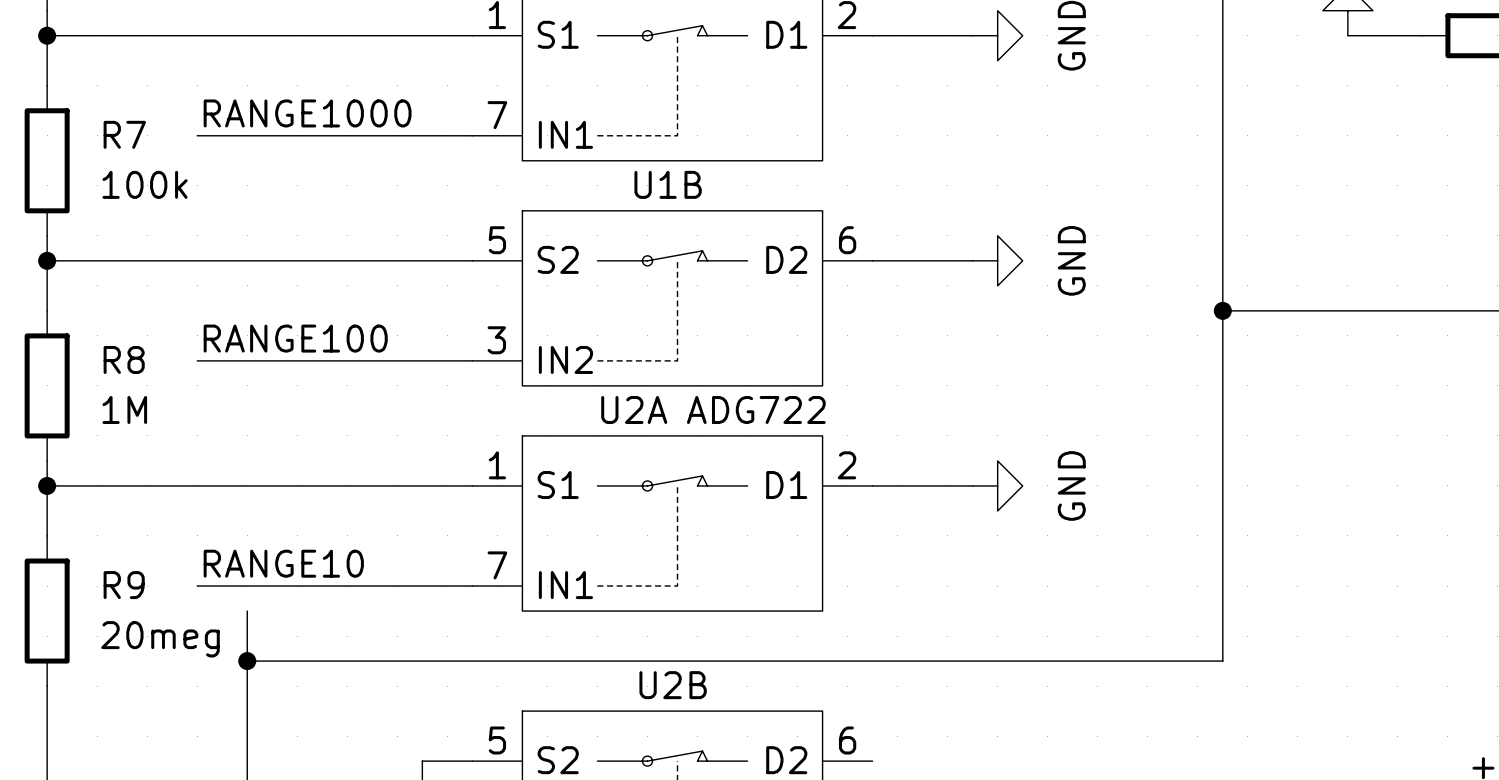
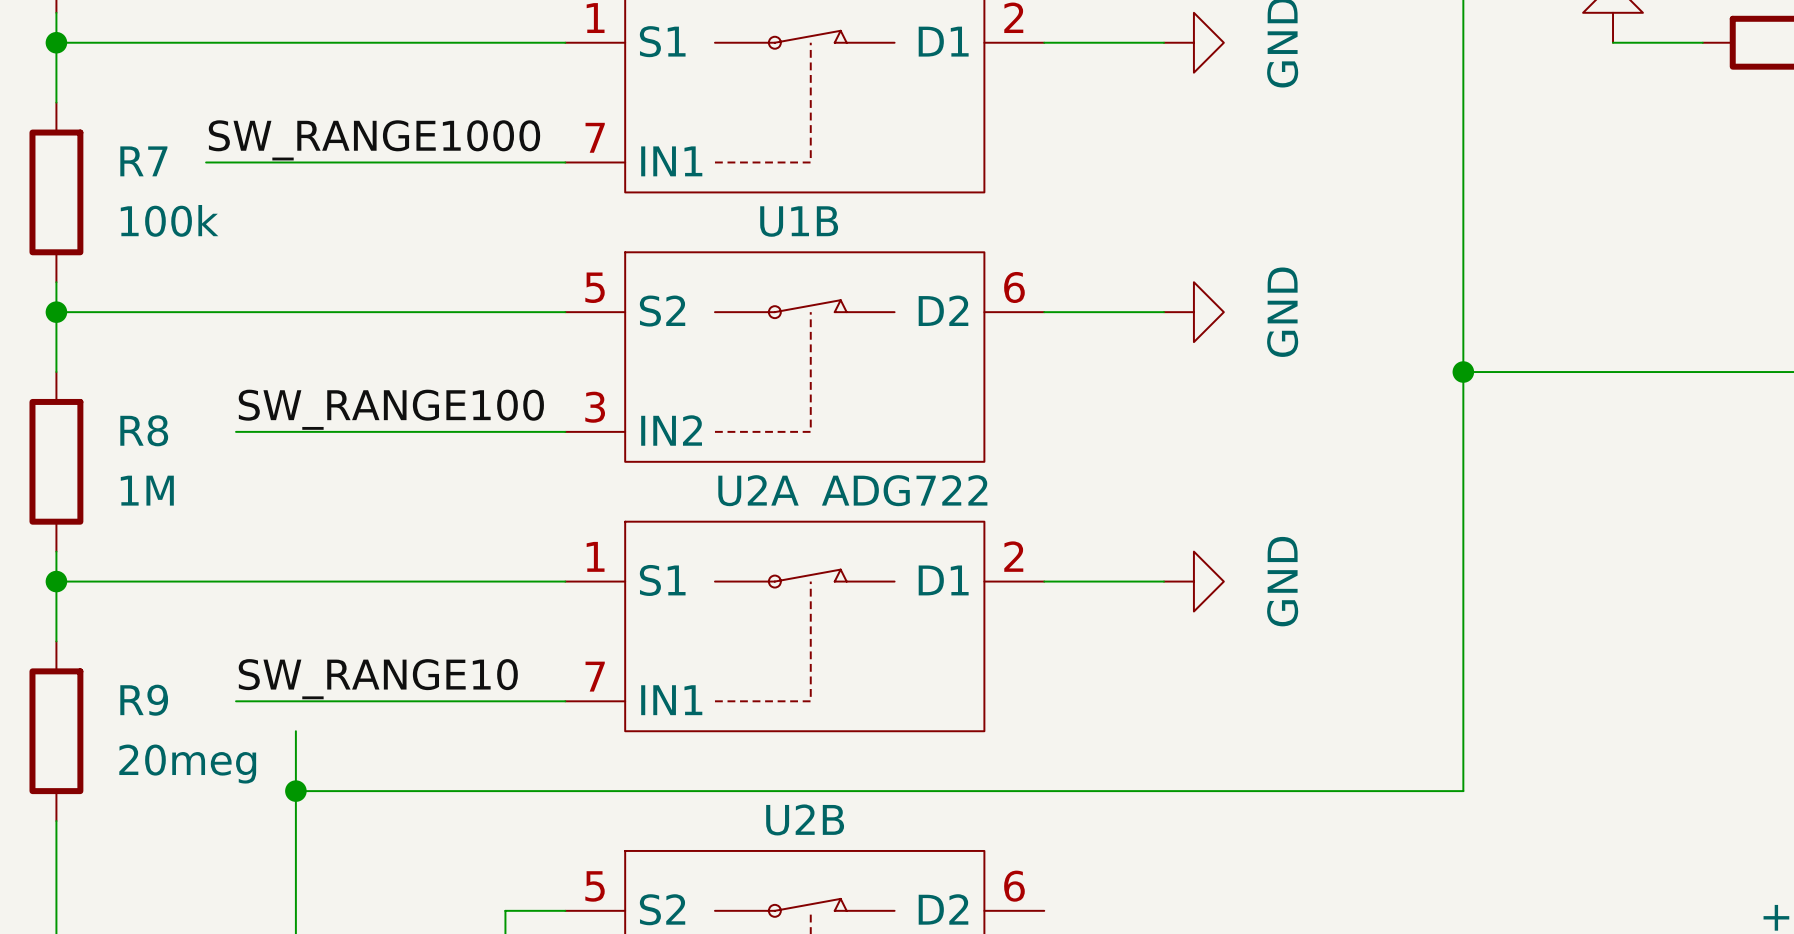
label: RANGE1000 (307, 113) -> SW_RANGE1000 (374, 140)
wire: none -> (206, 162) (236, 162)
label: RANGE100 (295, 338) -> SW_RANGE100 (391, 409)
label: RANGE10 (283, 563) -> SW_RANGE10 (378, 679)

